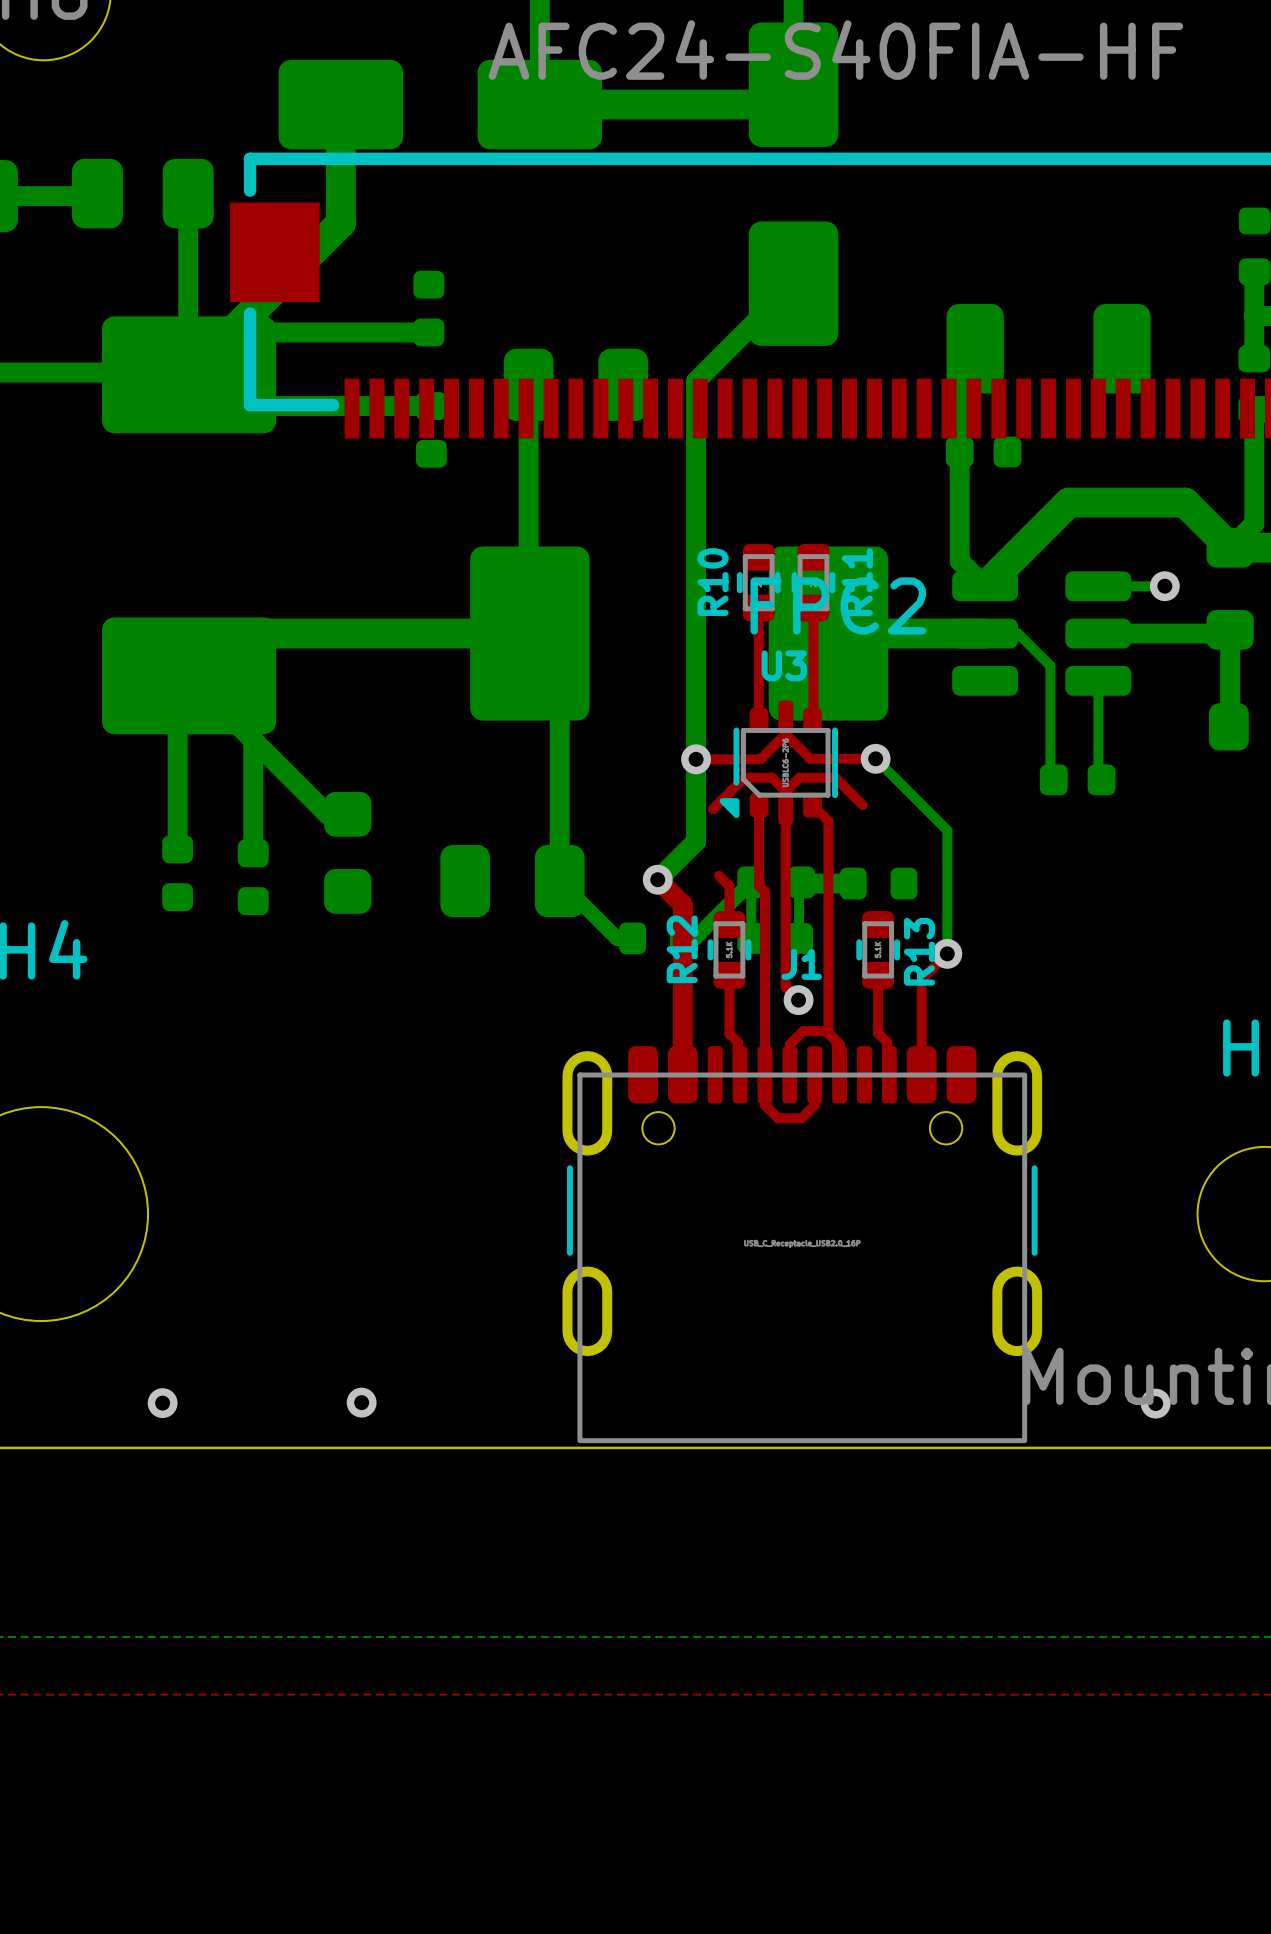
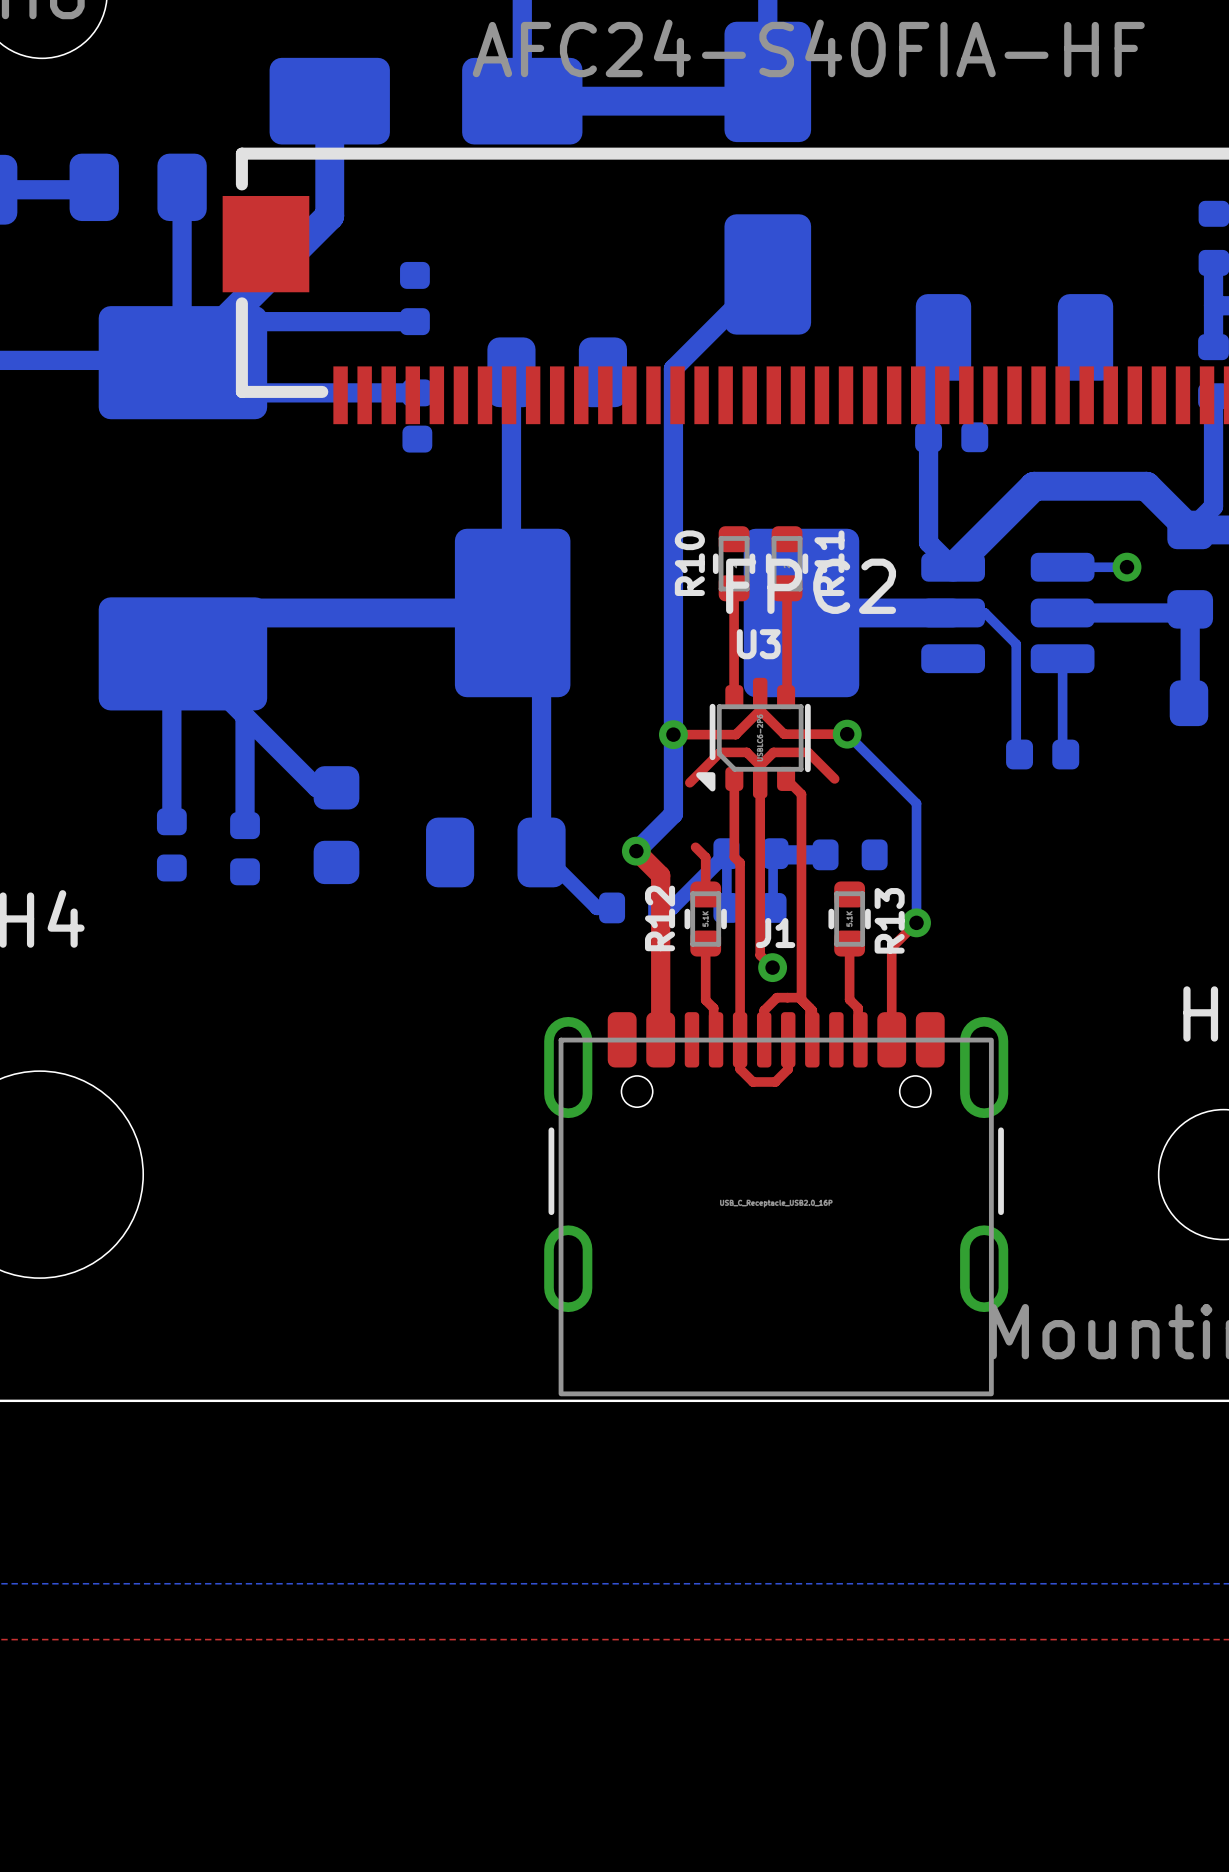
via: (361, 1402) -> none
via: (162, 1403) -> none
via: (1155, 1403) -> none

